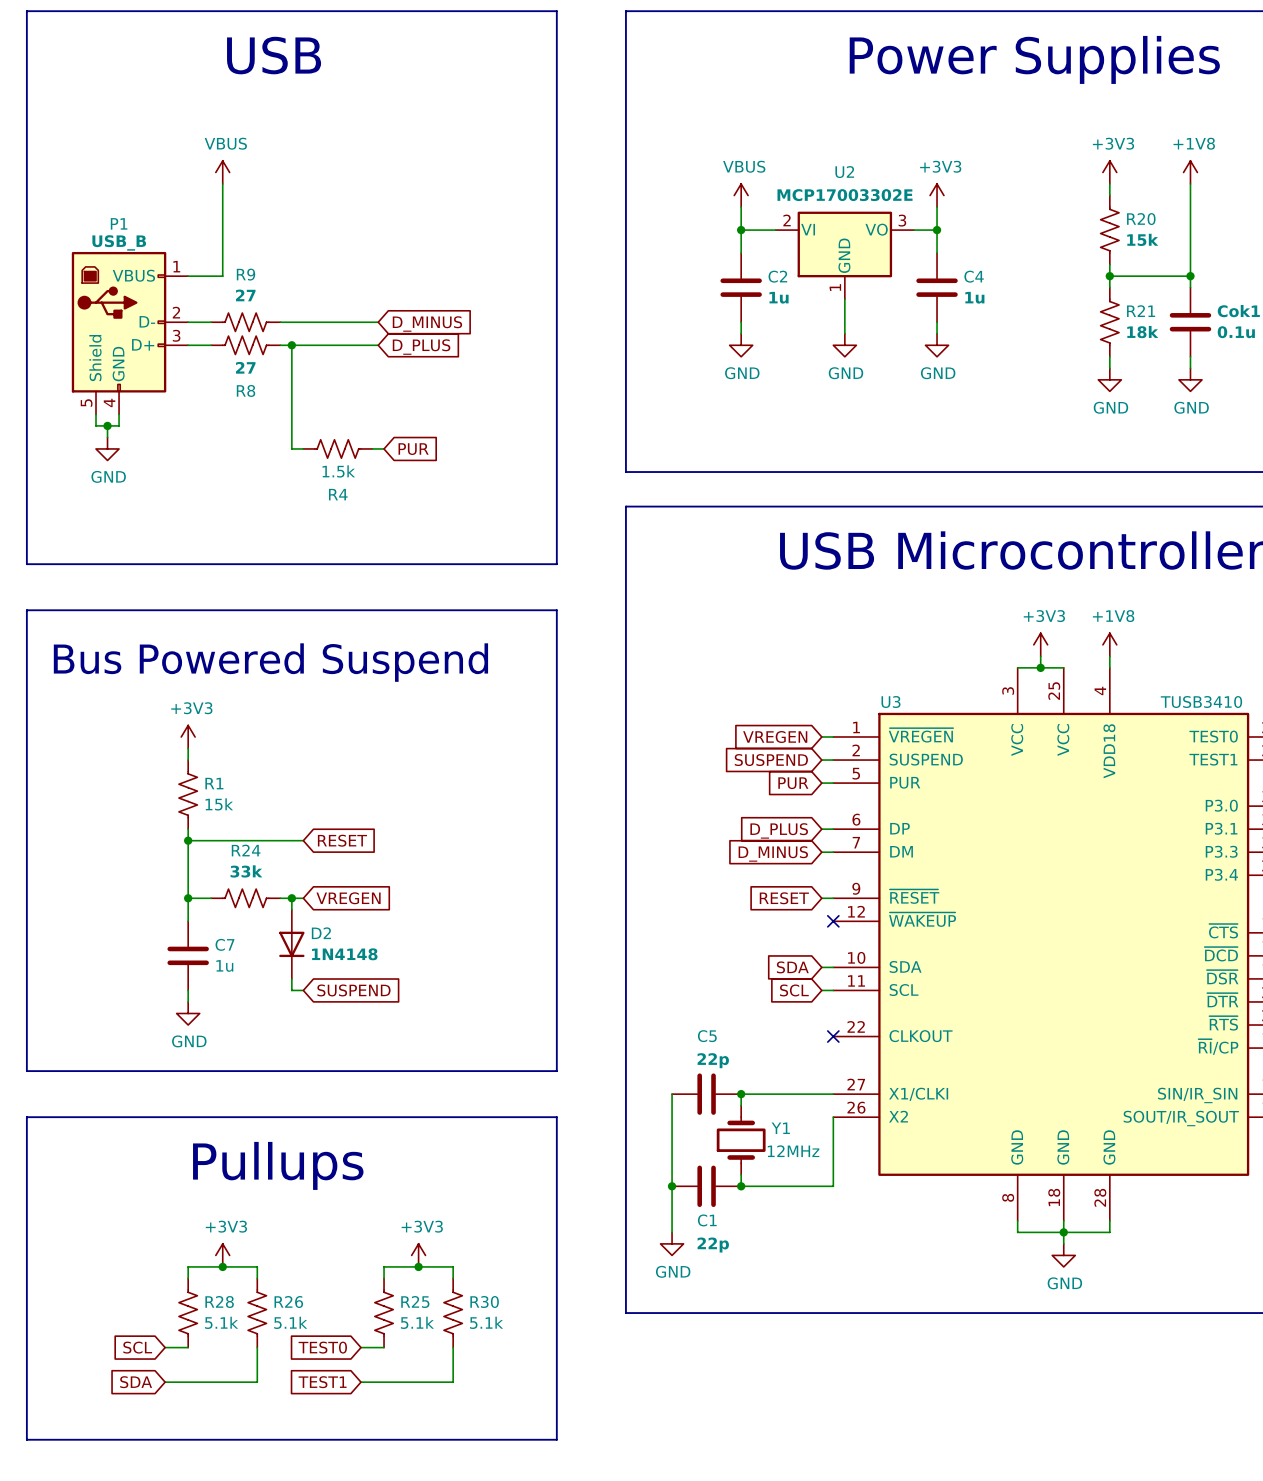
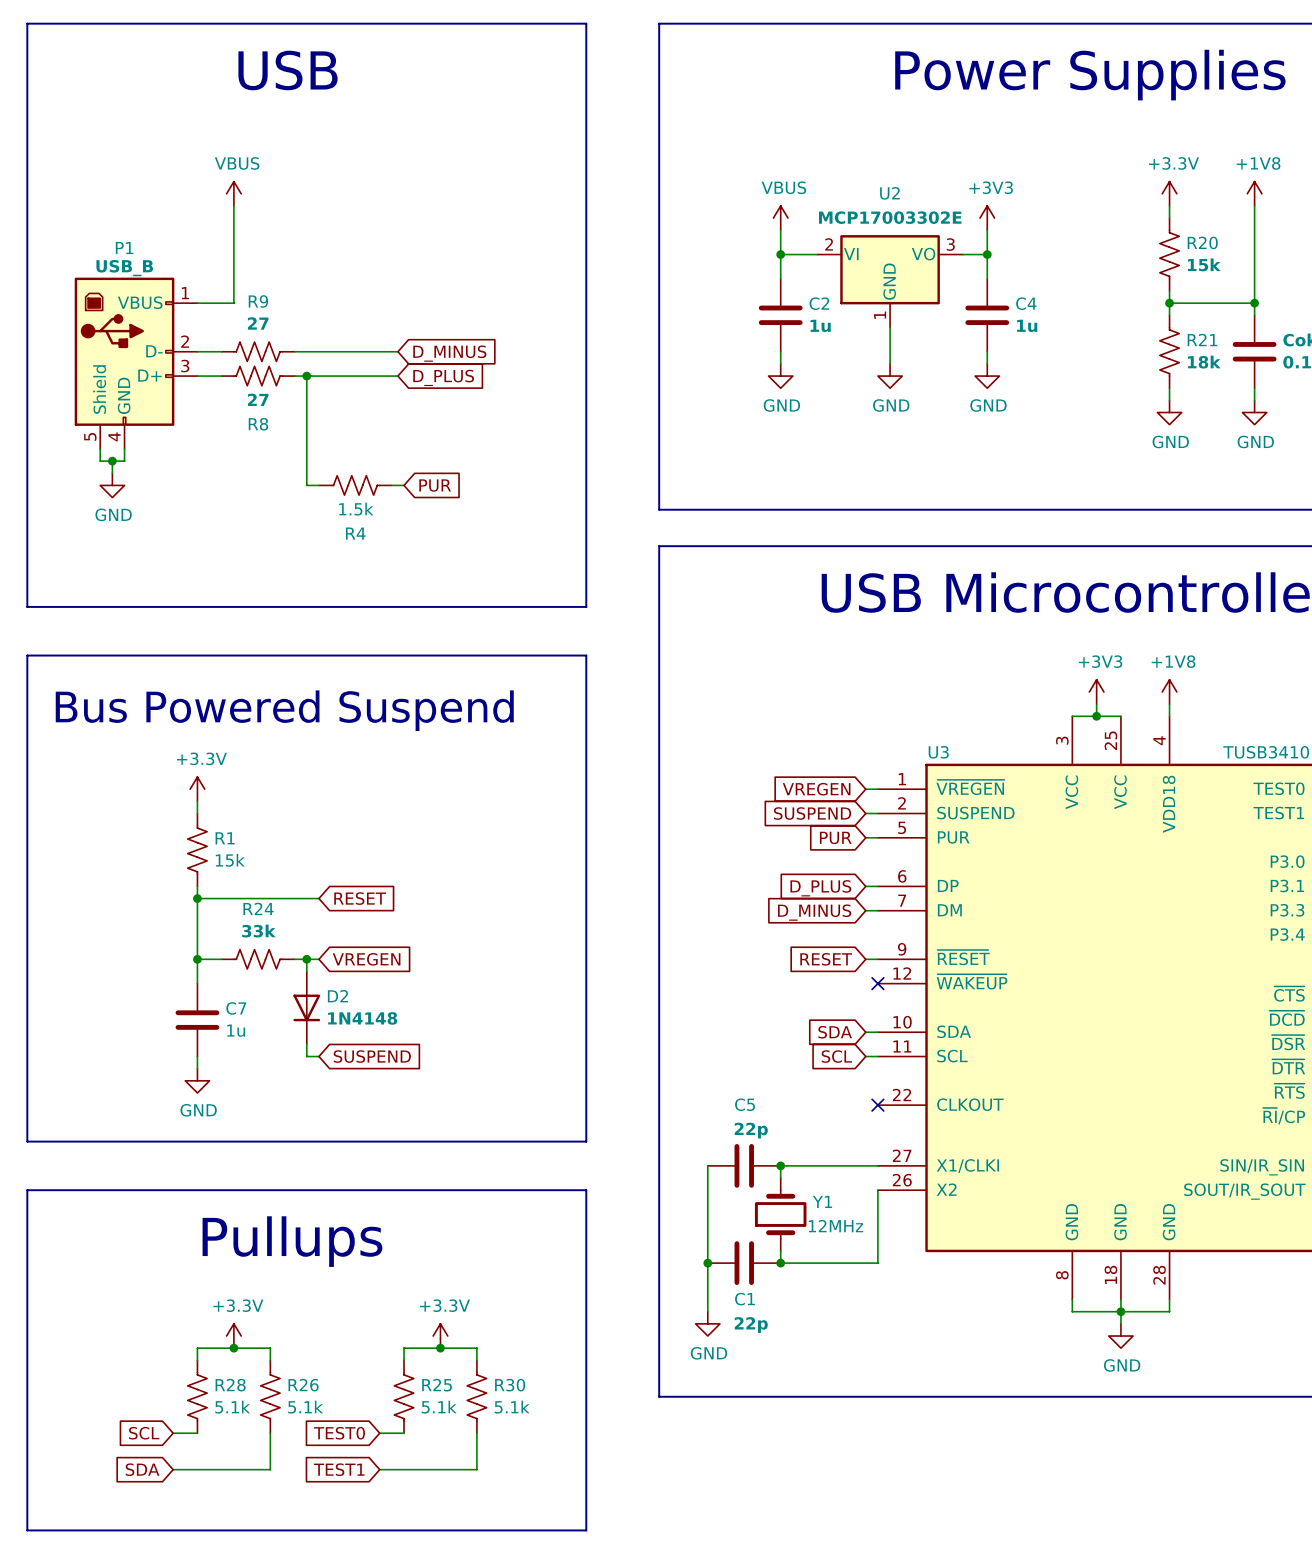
power symbol: +3V3 (1109, 172) -> +3.3V (1169, 193)
power symbol: +3V3 (188, 736) -> +3.3V (197, 789)
power symbol: +3V3 (222, 1255) -> +3.3V (233, 1336)
power symbol: +3V3 (418, 1255) -> +3.3V (440, 1336)

